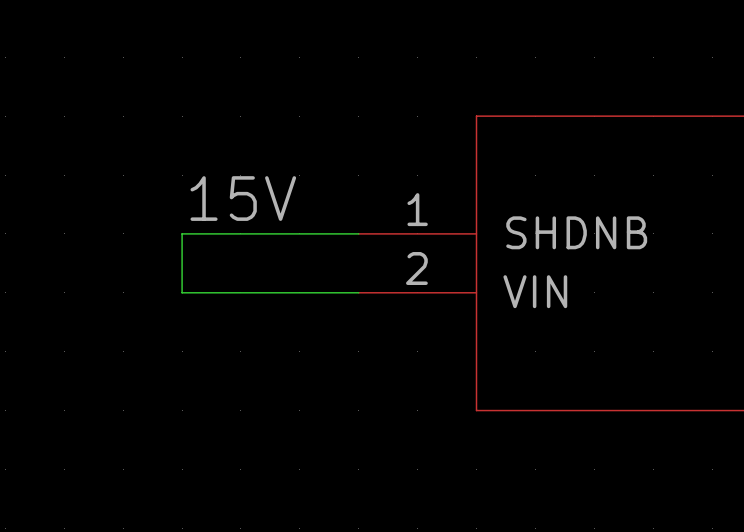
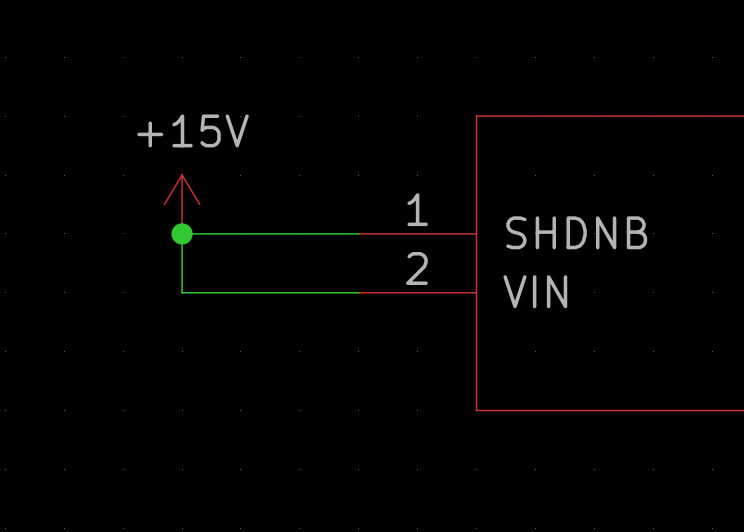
label: 15V (243, 198) -> none
power symbol: none -> +15V (182, 204)
junction: none -> (182, 233)

